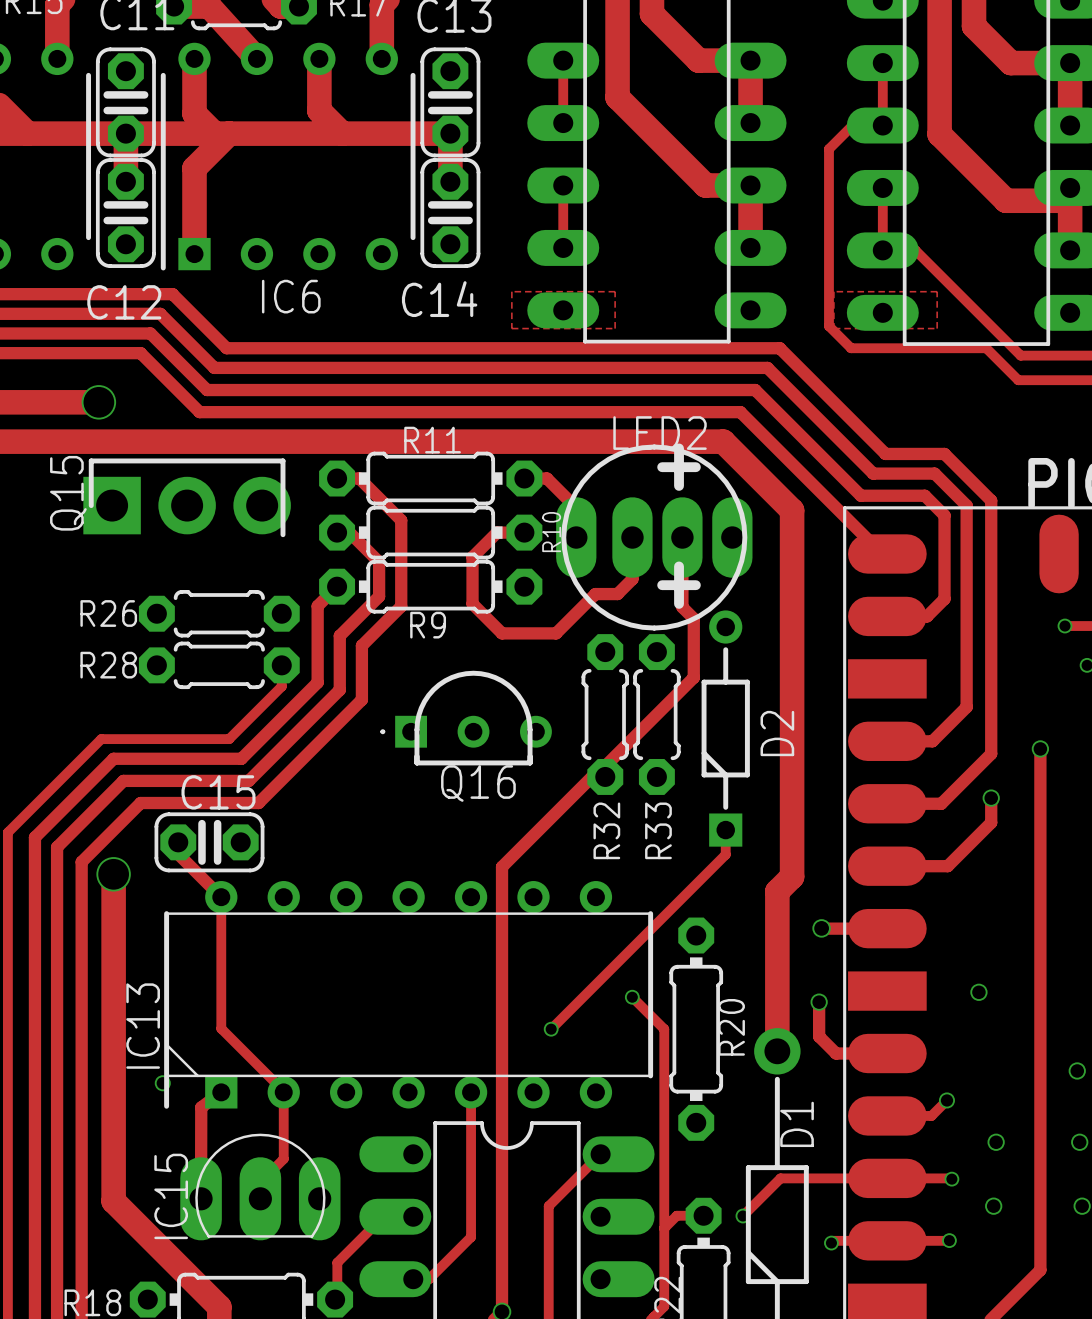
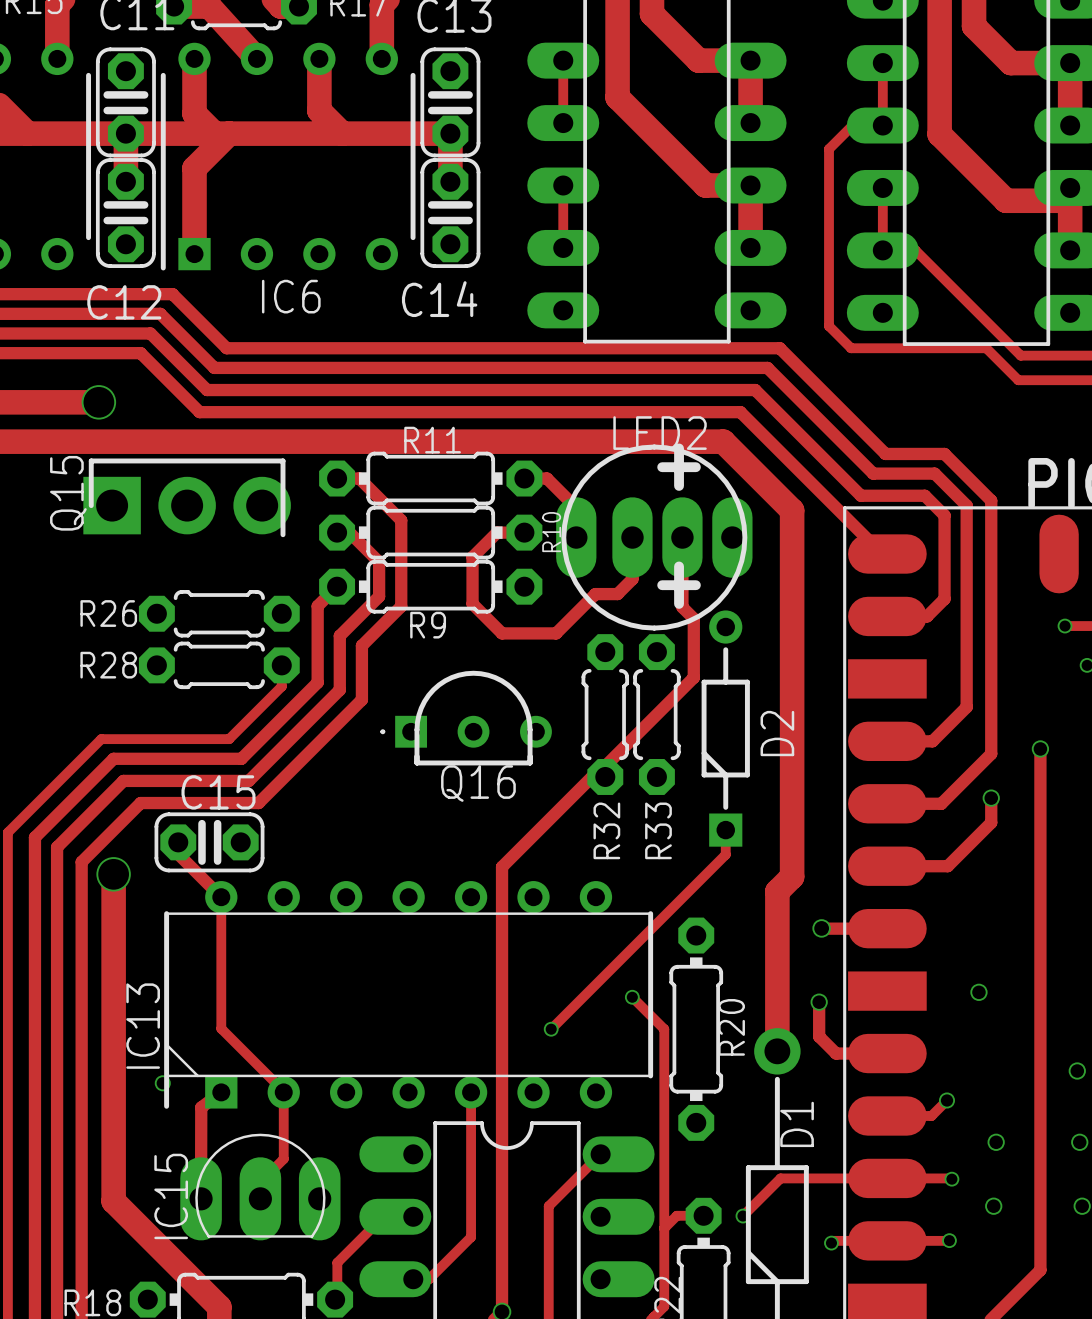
zone outline: (511, 291) (615, 291) (615, 328) (511, 328) (511, 291) -> none
zone outline: (833, 291) (937, 291) (937, 328) (833, 328) (833, 291) -> none

